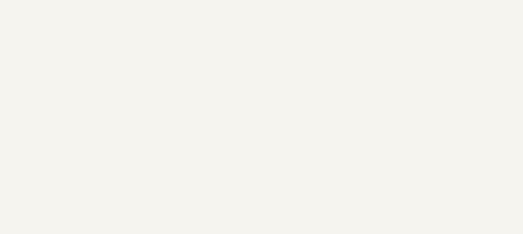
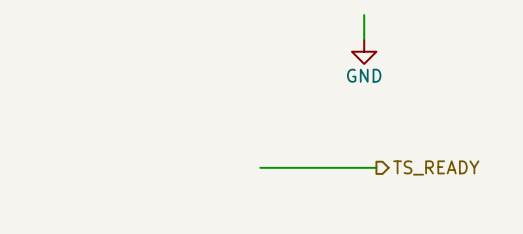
wire: none -> (364, 15) (364, 39)
power symbol: none -> GND (364, 51)
wire: none -> (260, 167) (376, 167)
hierarchical label: none -> TS_READY (436, 167)

